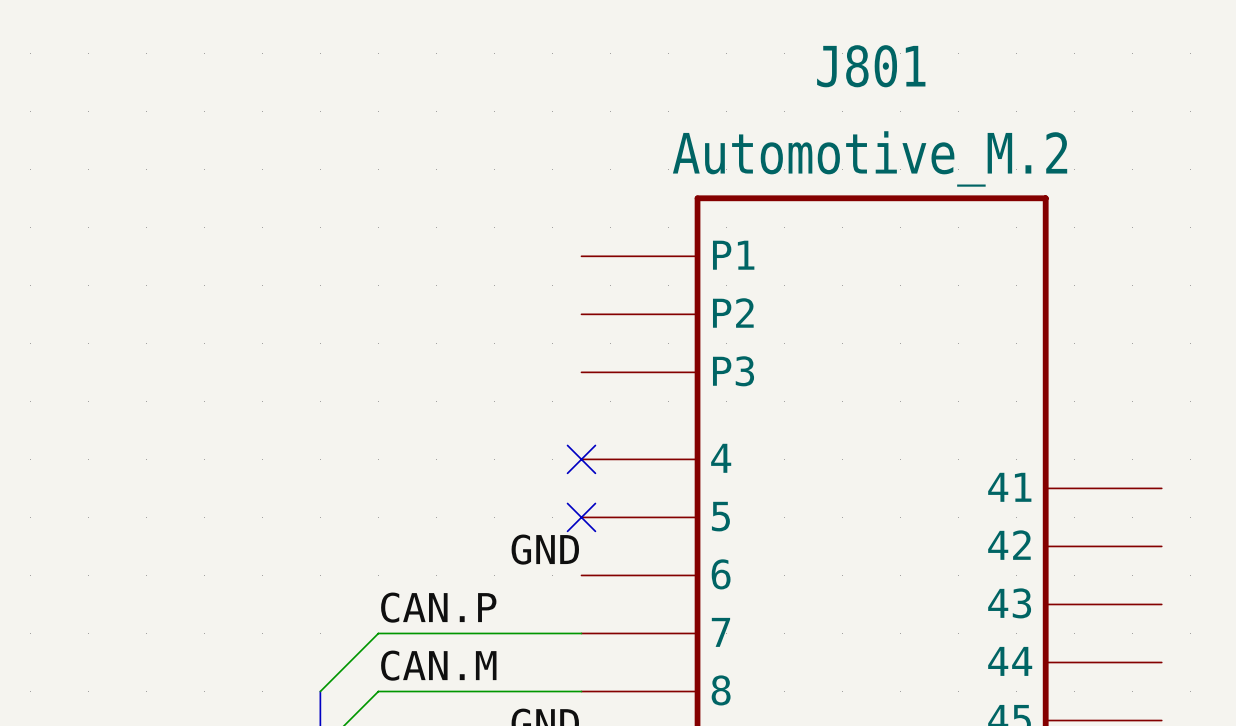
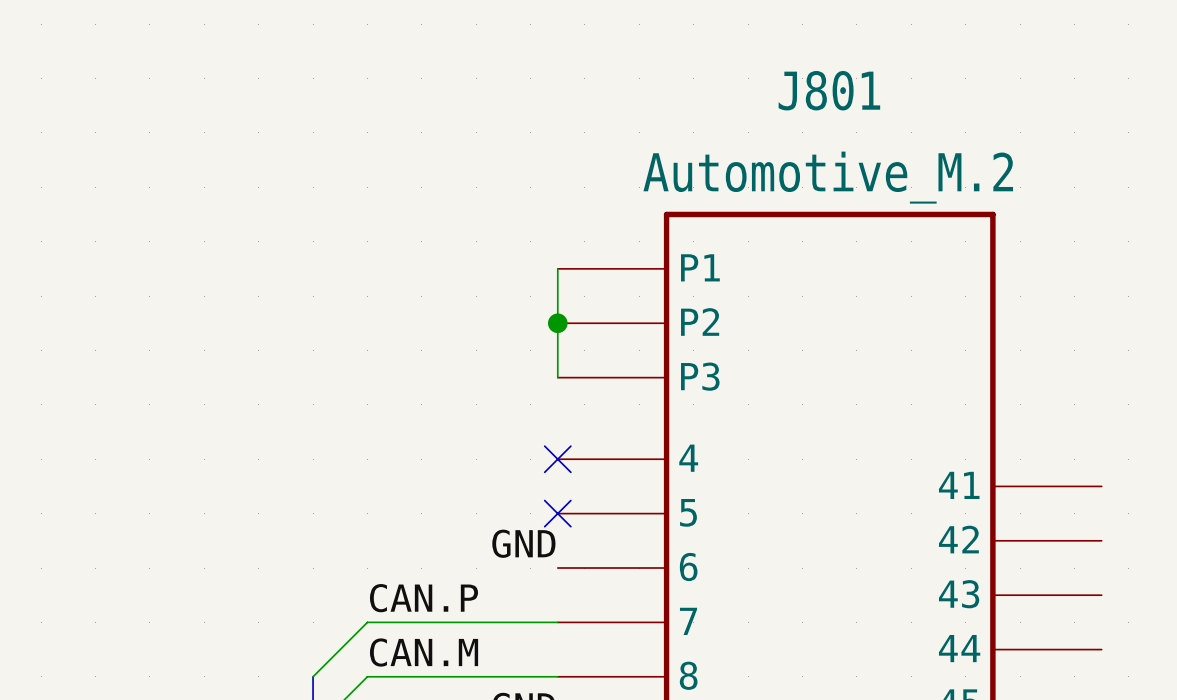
wire: none -> (557, 268) (557, 377)
junction: none -> (557, 323)

